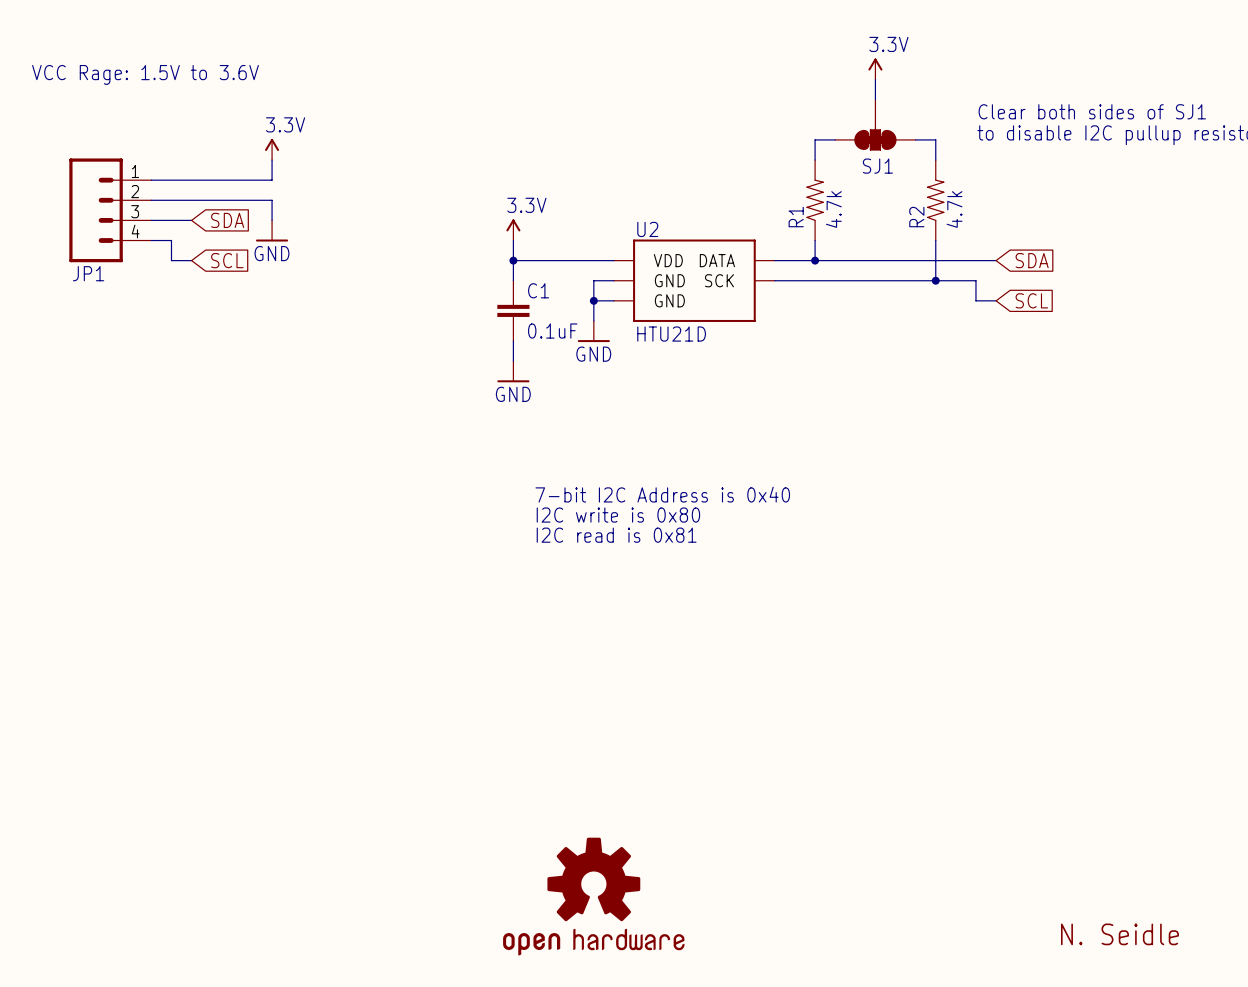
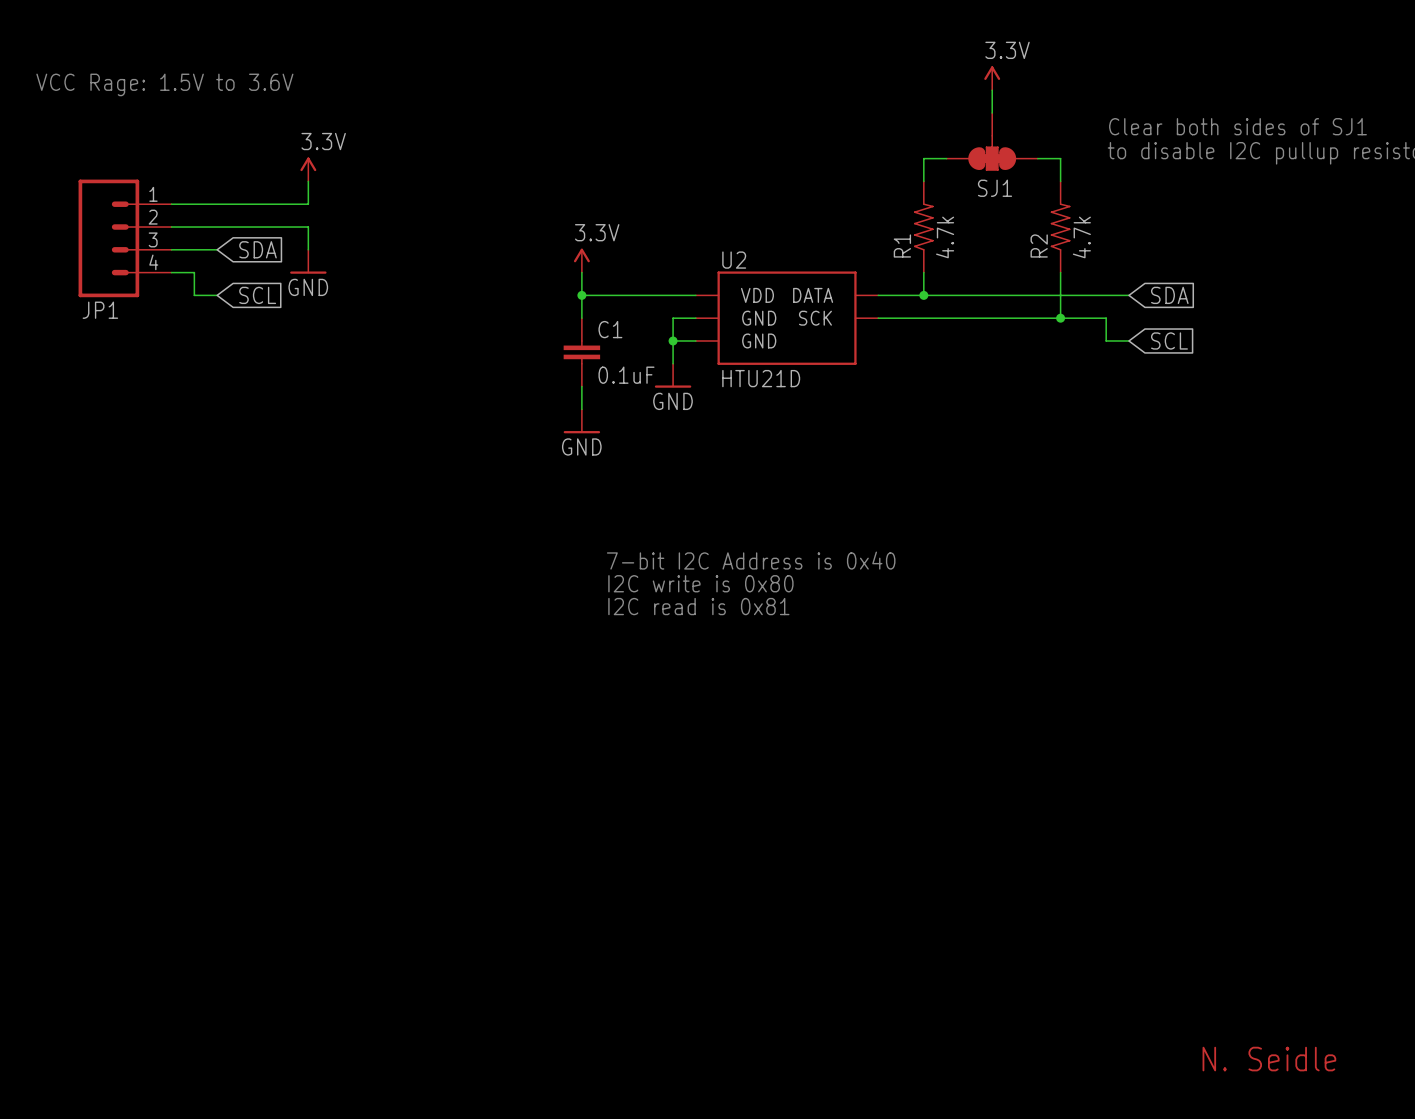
part: (593, 896) -> none

